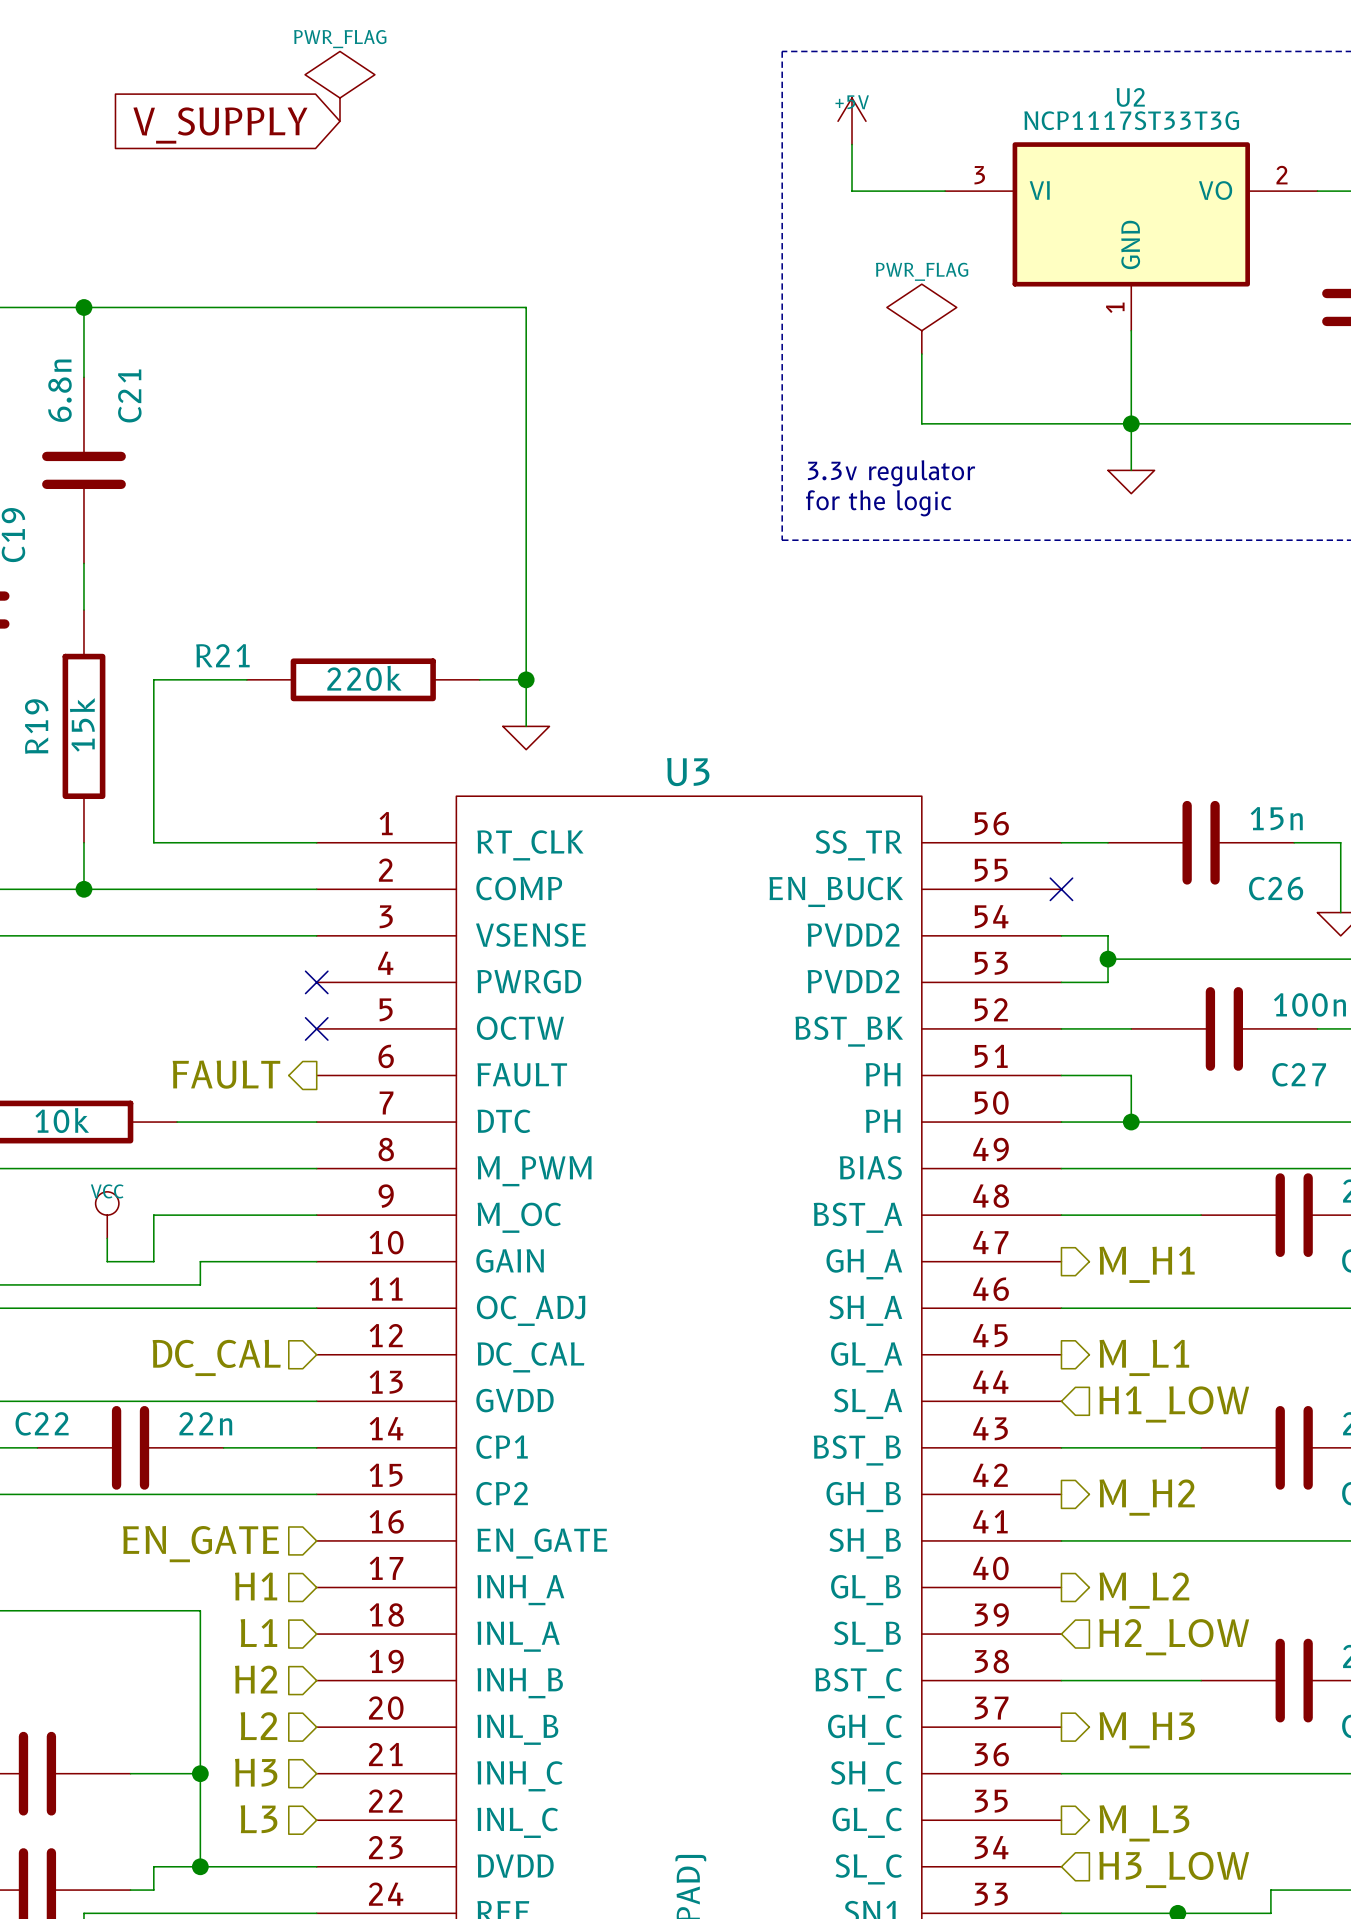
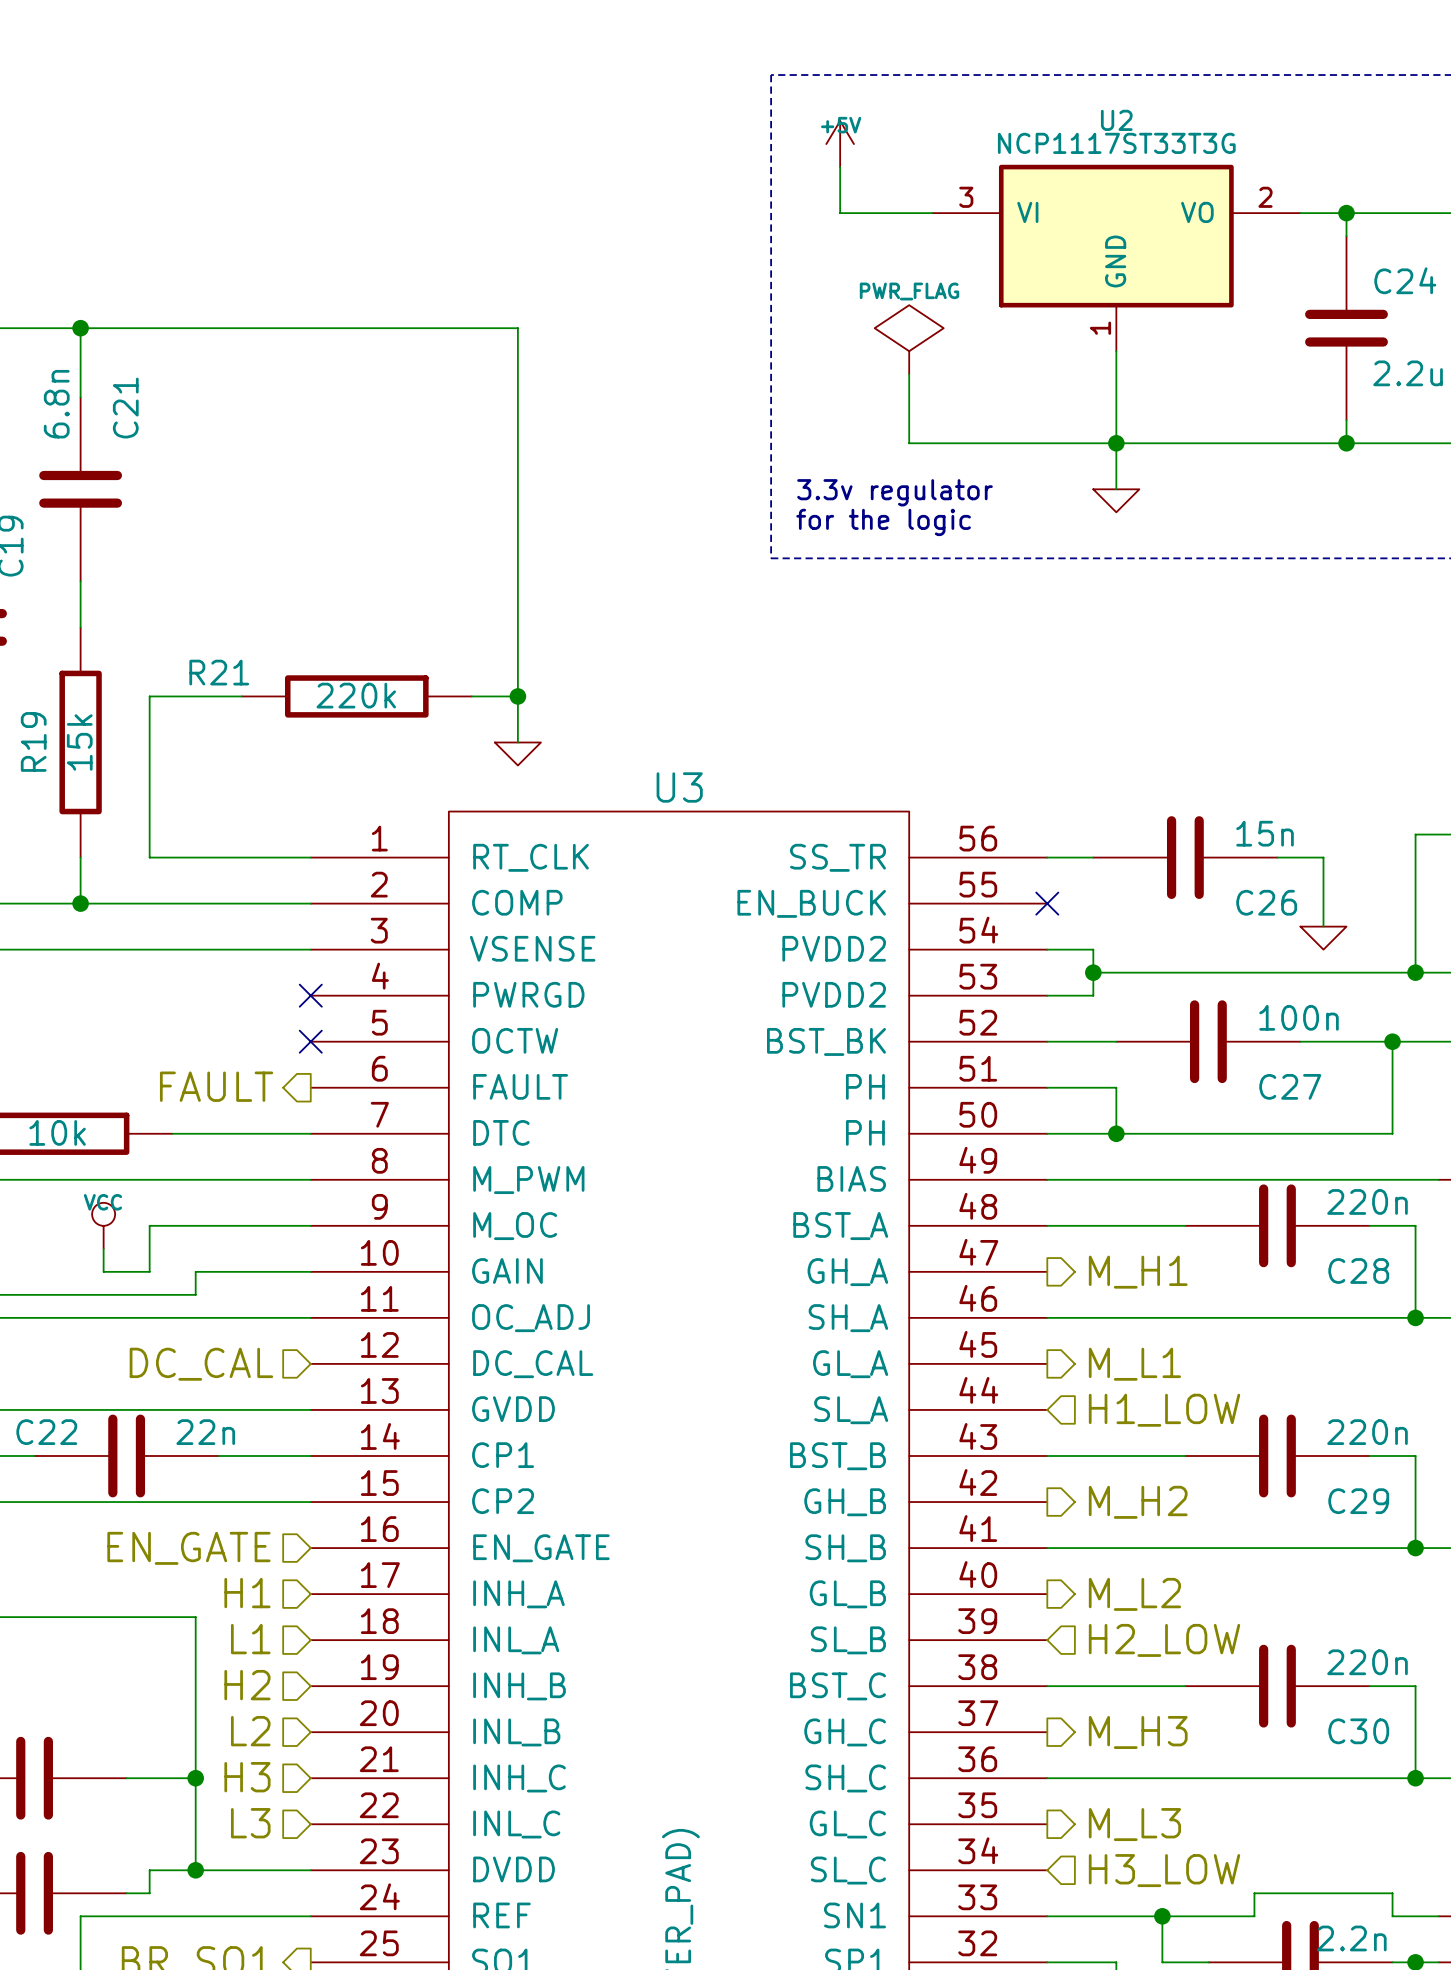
power symbol: PWR_FLAG (339, 86) -> none
global label: V_SUPPLY (220, 125) -> none

